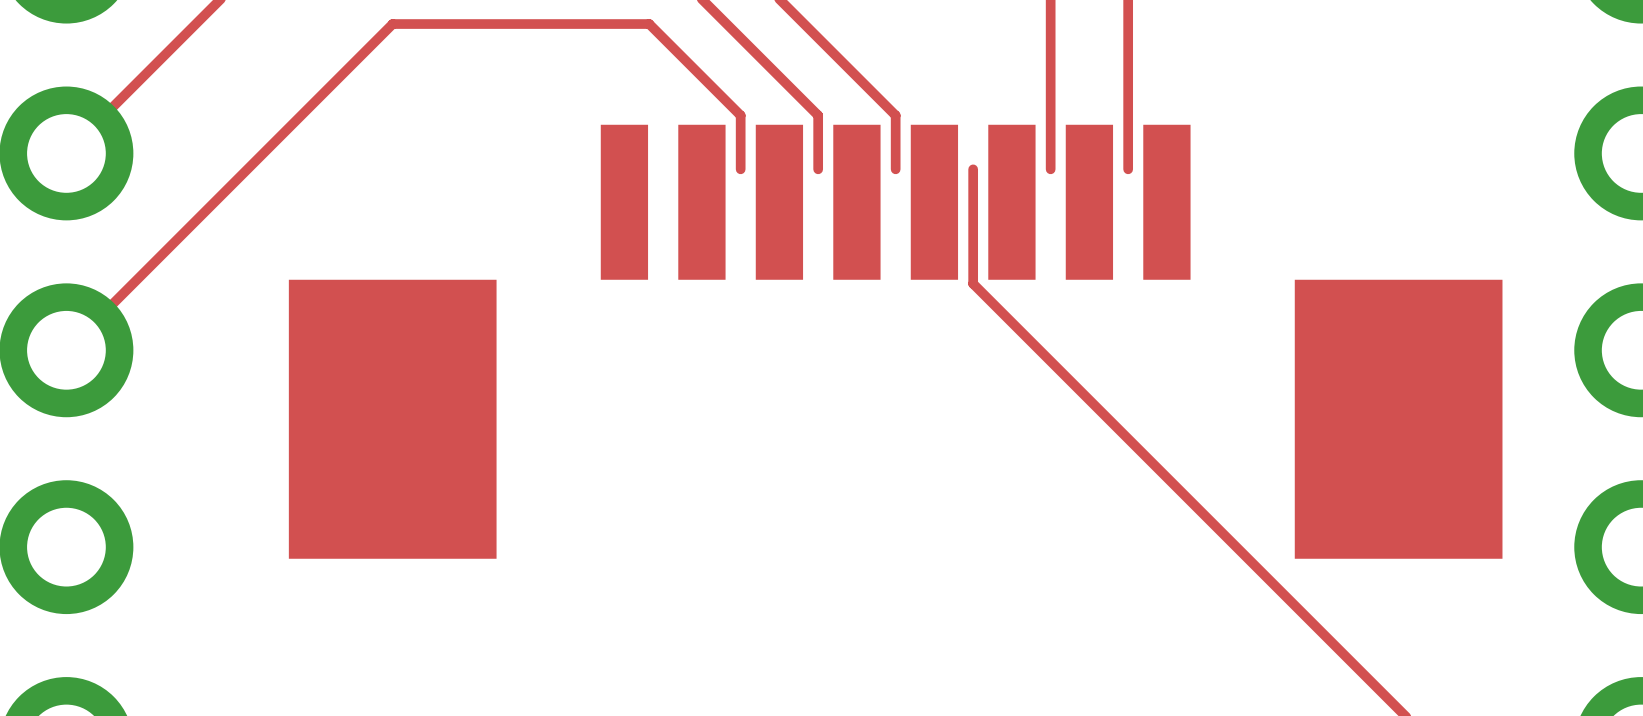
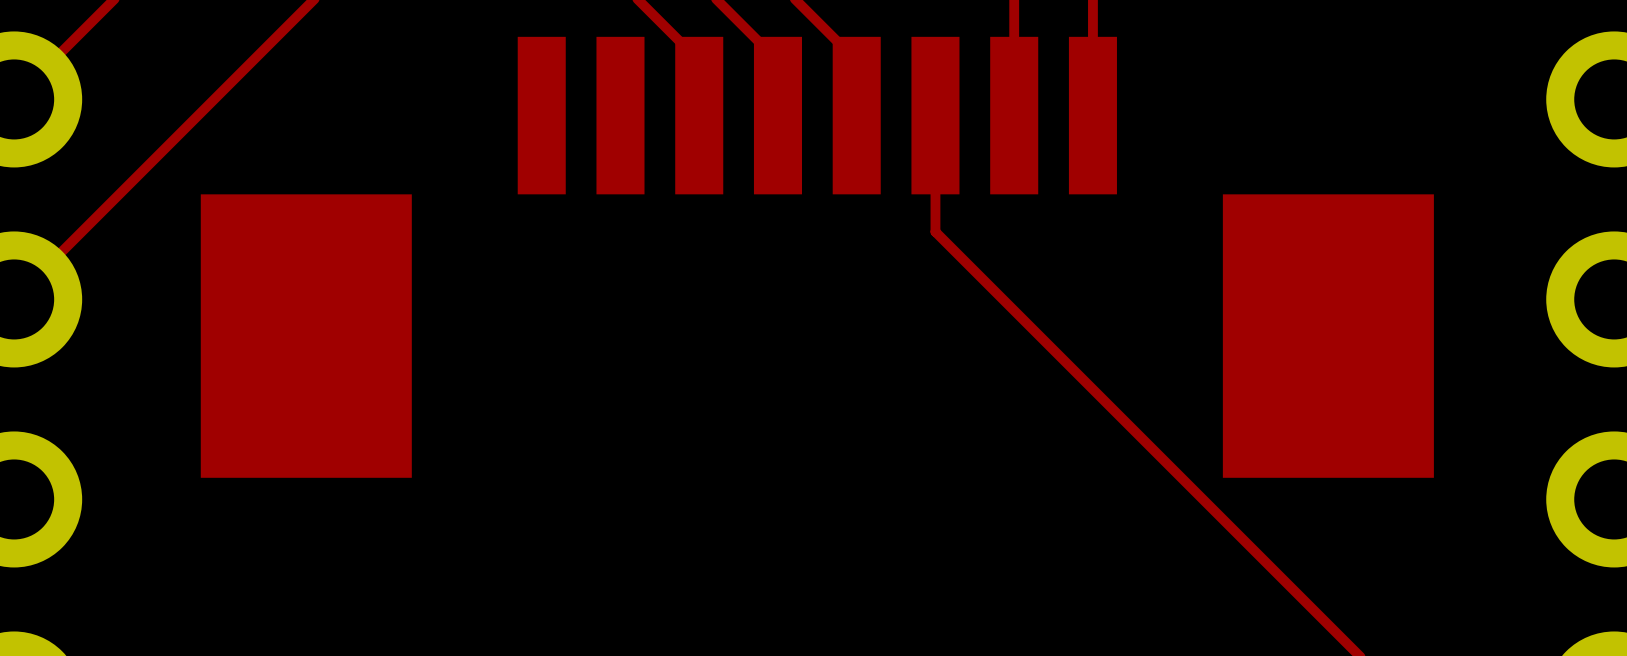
part position: (895, 341) -> (817, 257)

